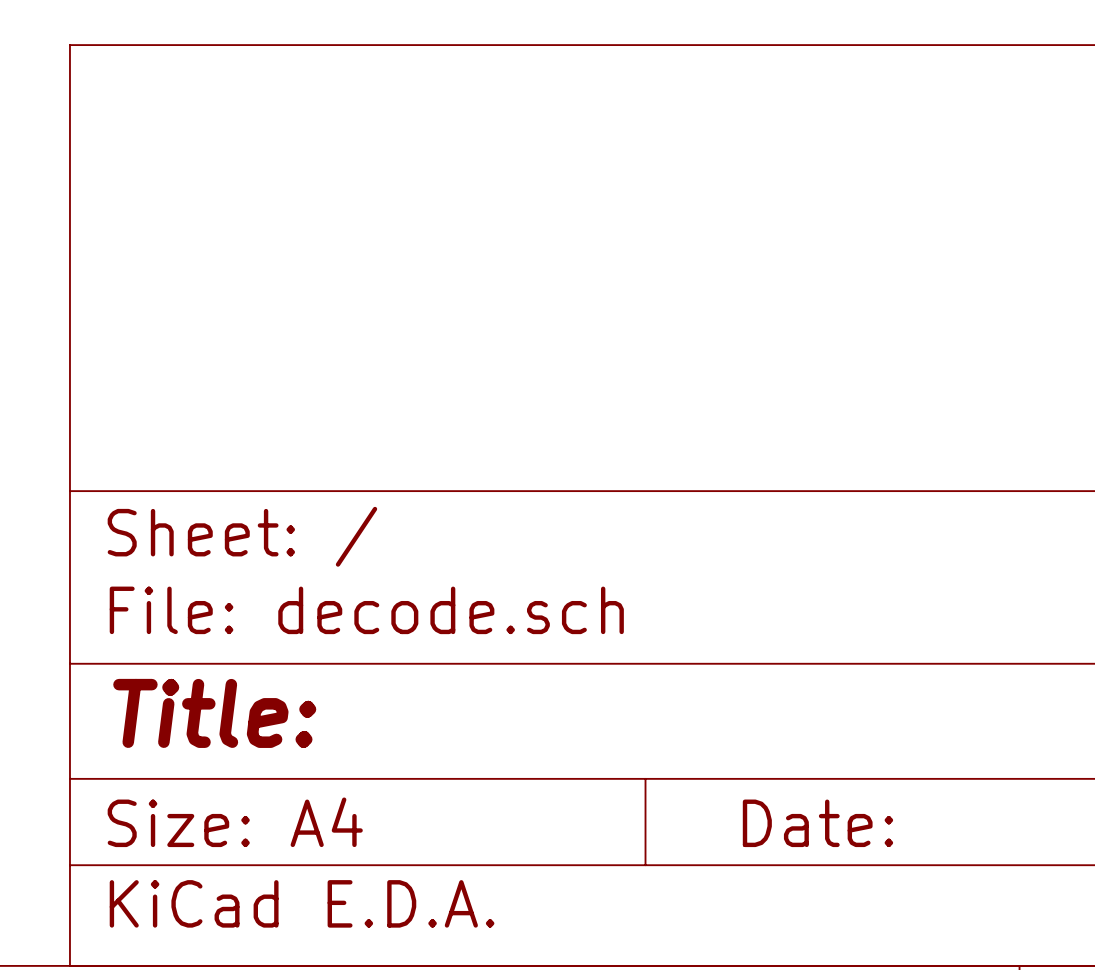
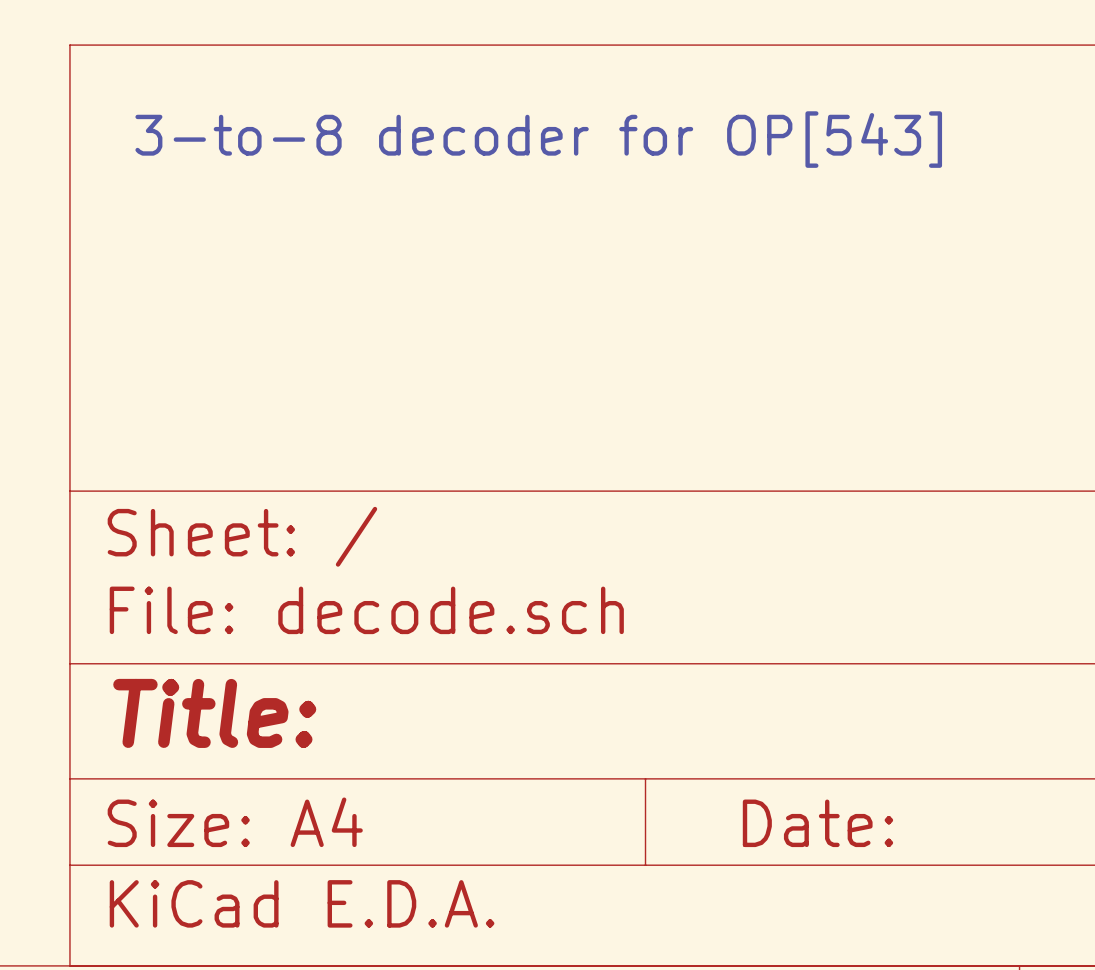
text: none -> 3-to-8 decoder for OP[543] (538, 139)

